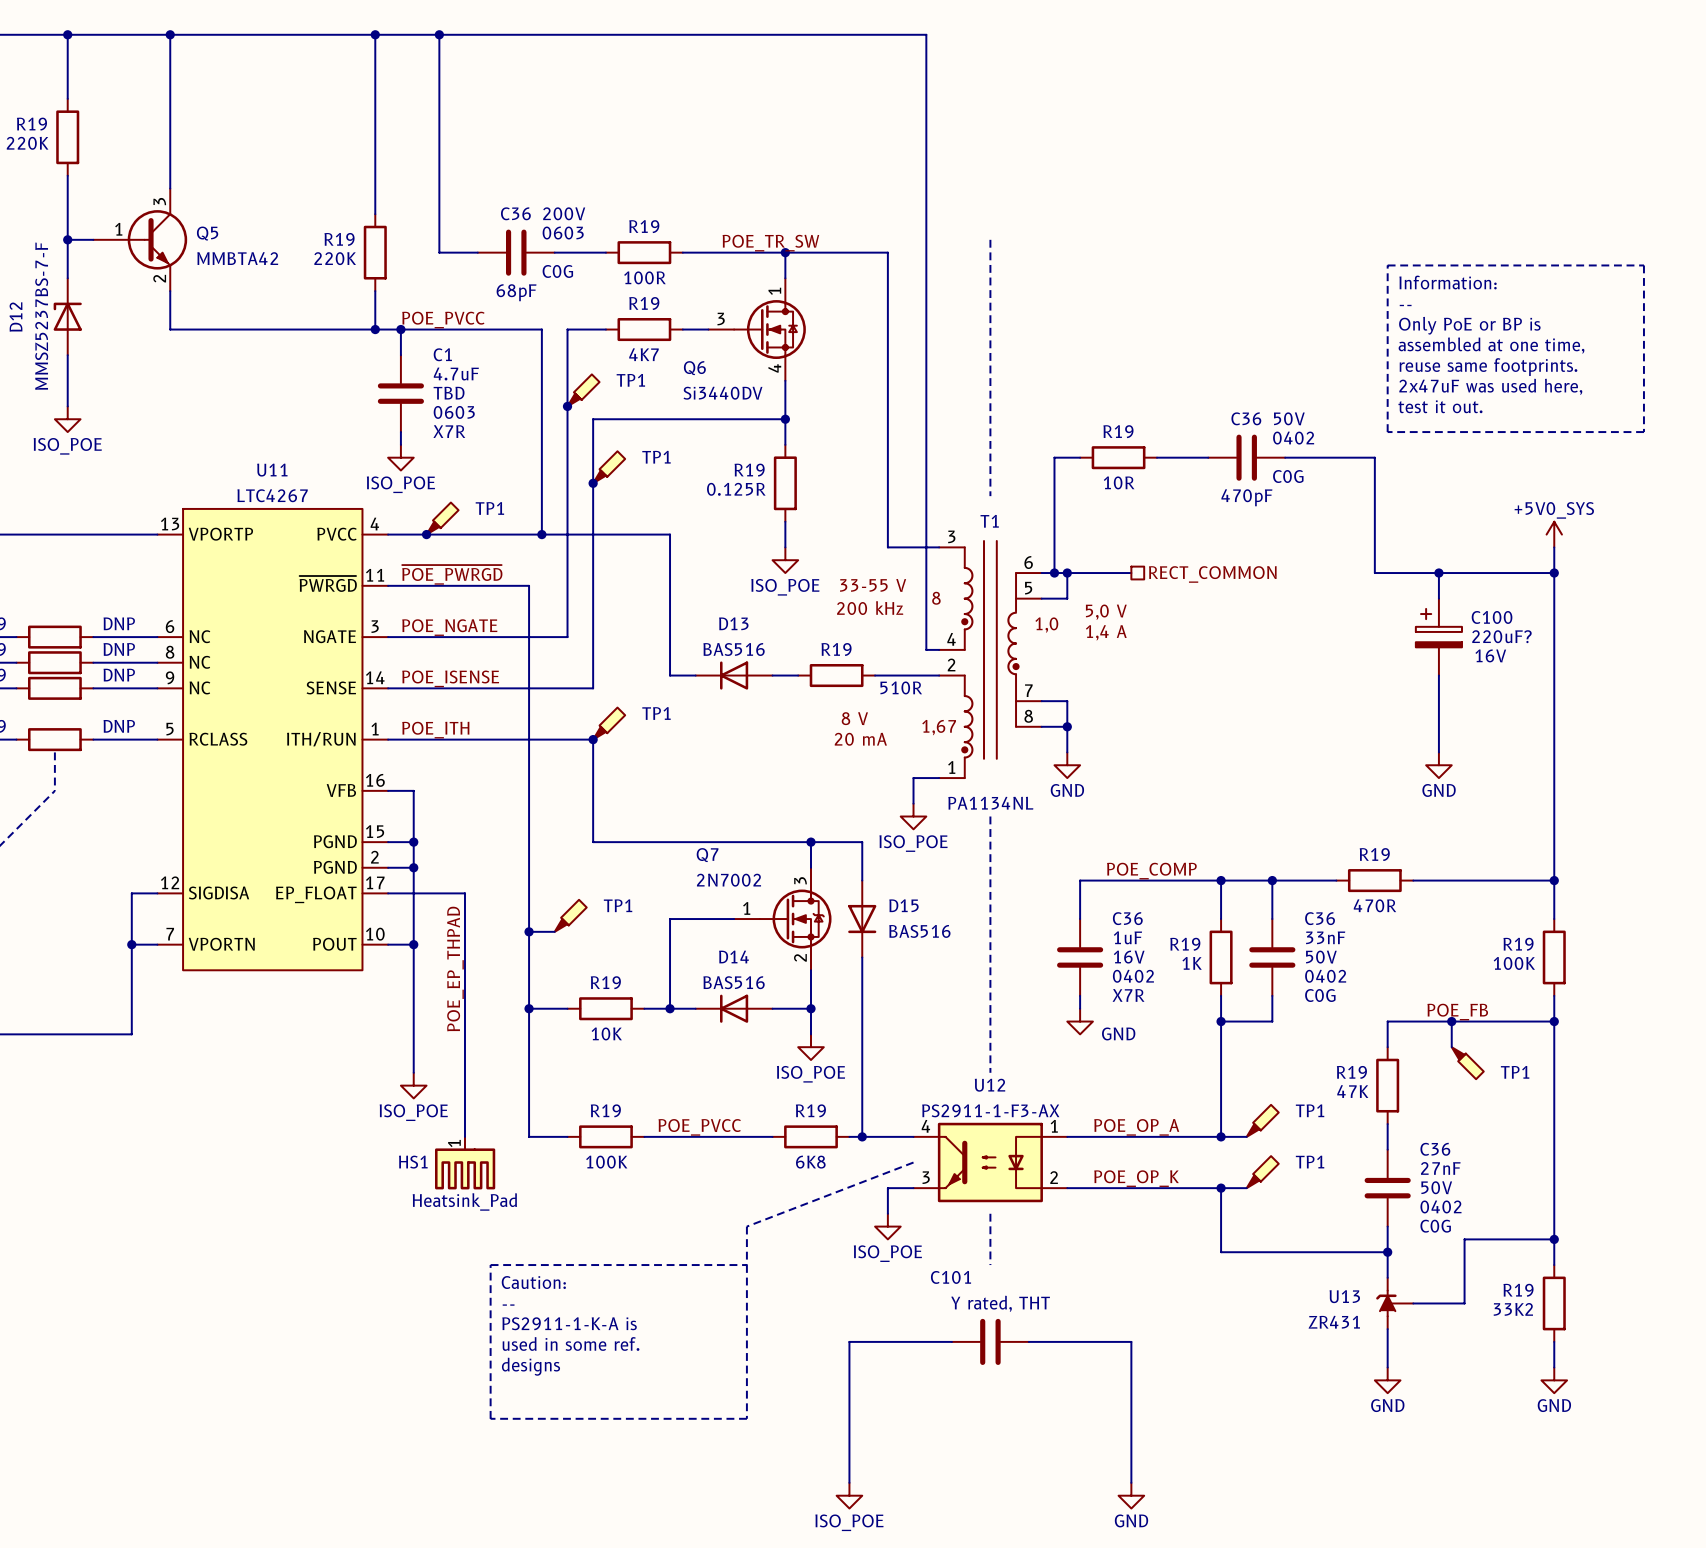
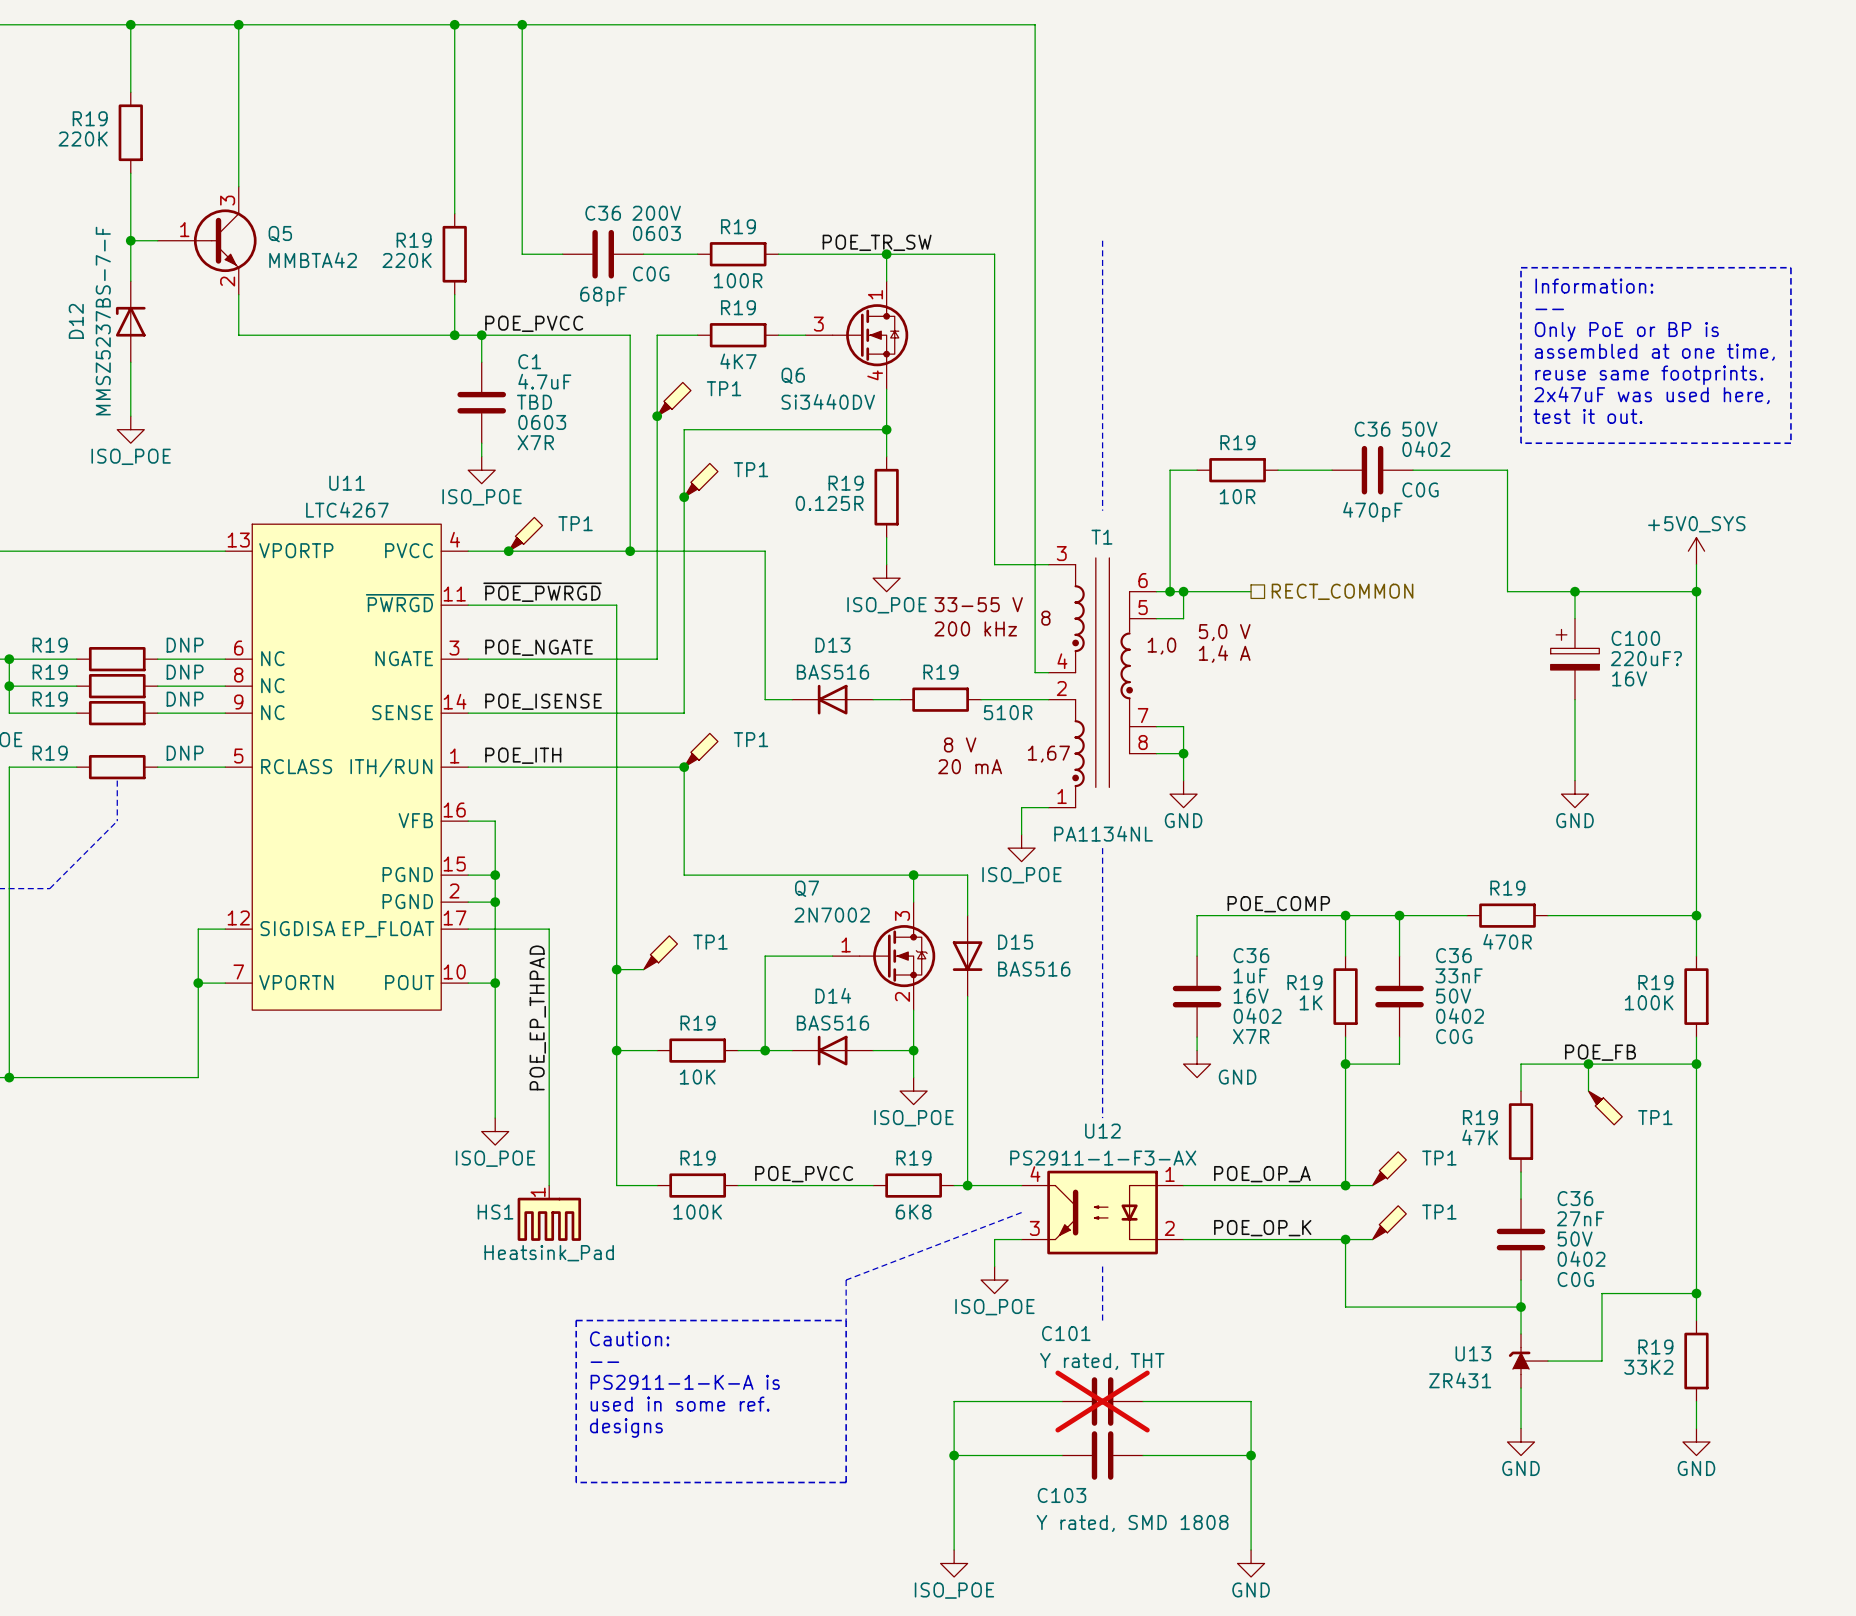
C101 do-not-place cross: none -> (1102, 1401)
wire: none -> (954, 1455) (1062, 1455)
junction: none -> (954, 1455)
C103: none -> Y rated, SMD 1808 (1102, 1455)
wire: none -> (1143, 1455) (1251, 1455)
junction: none -> (1251, 1455)

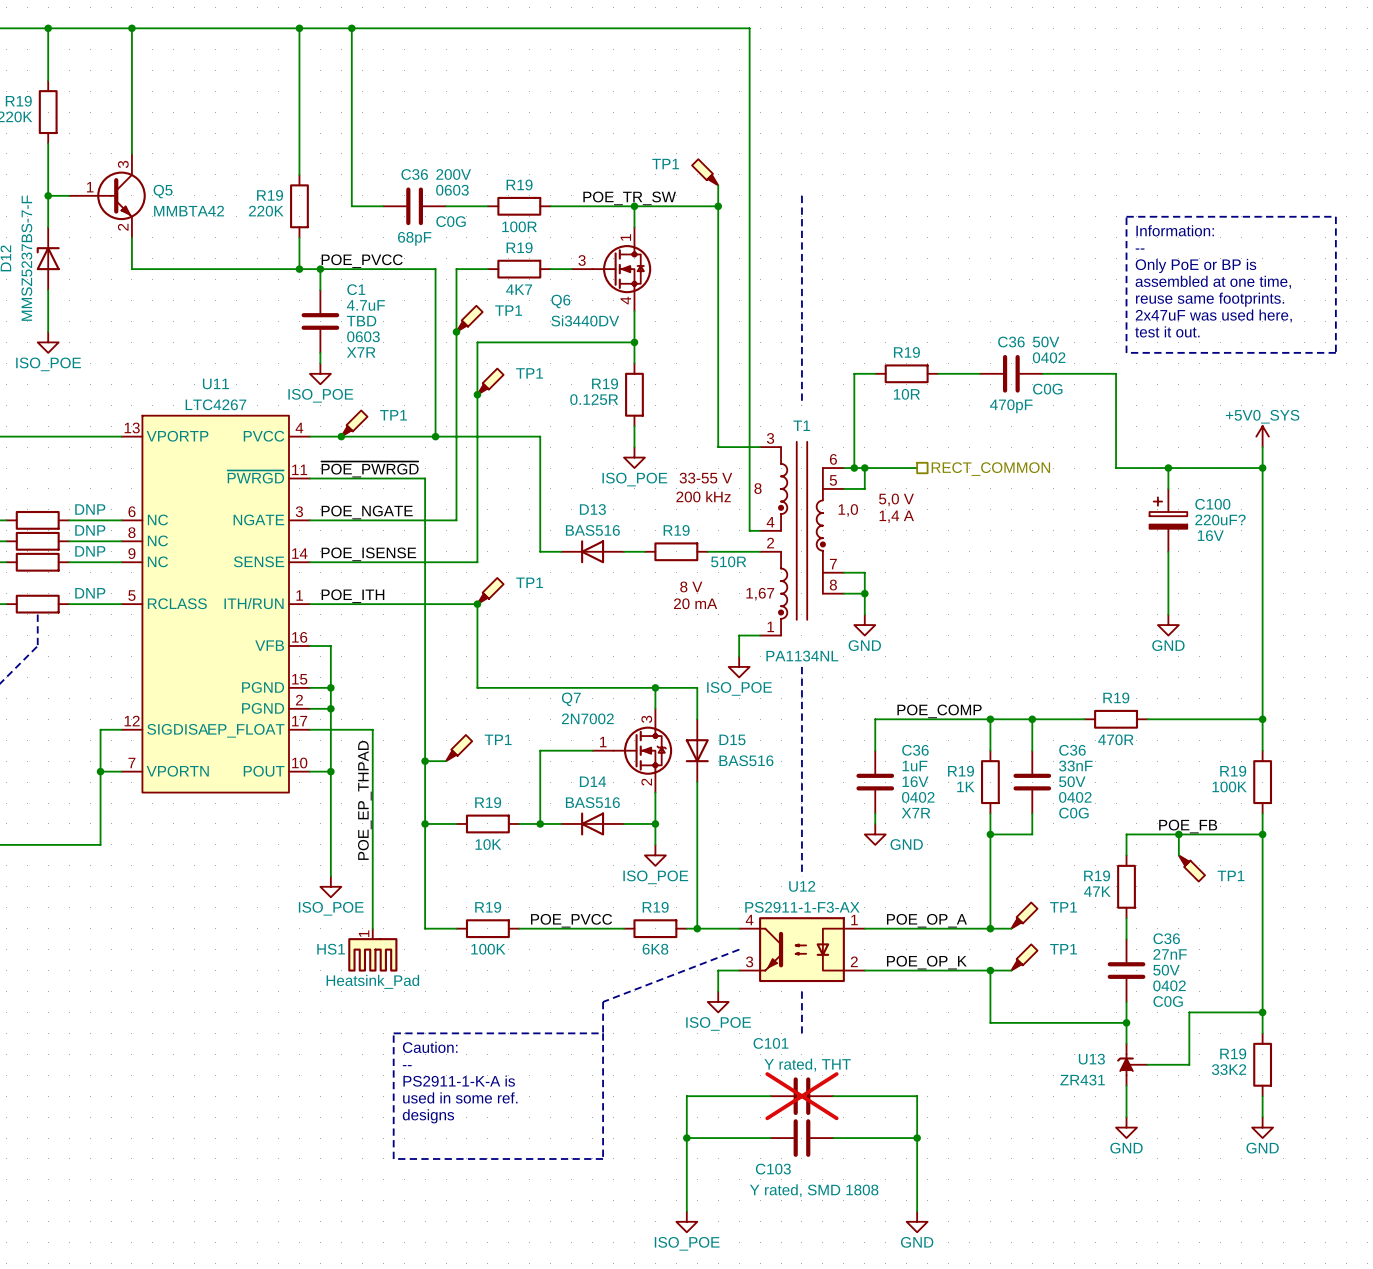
TP1: none -> (705, 172)
wire: none -> (718, 185) (718, 206)
junction: none -> (718, 206)

